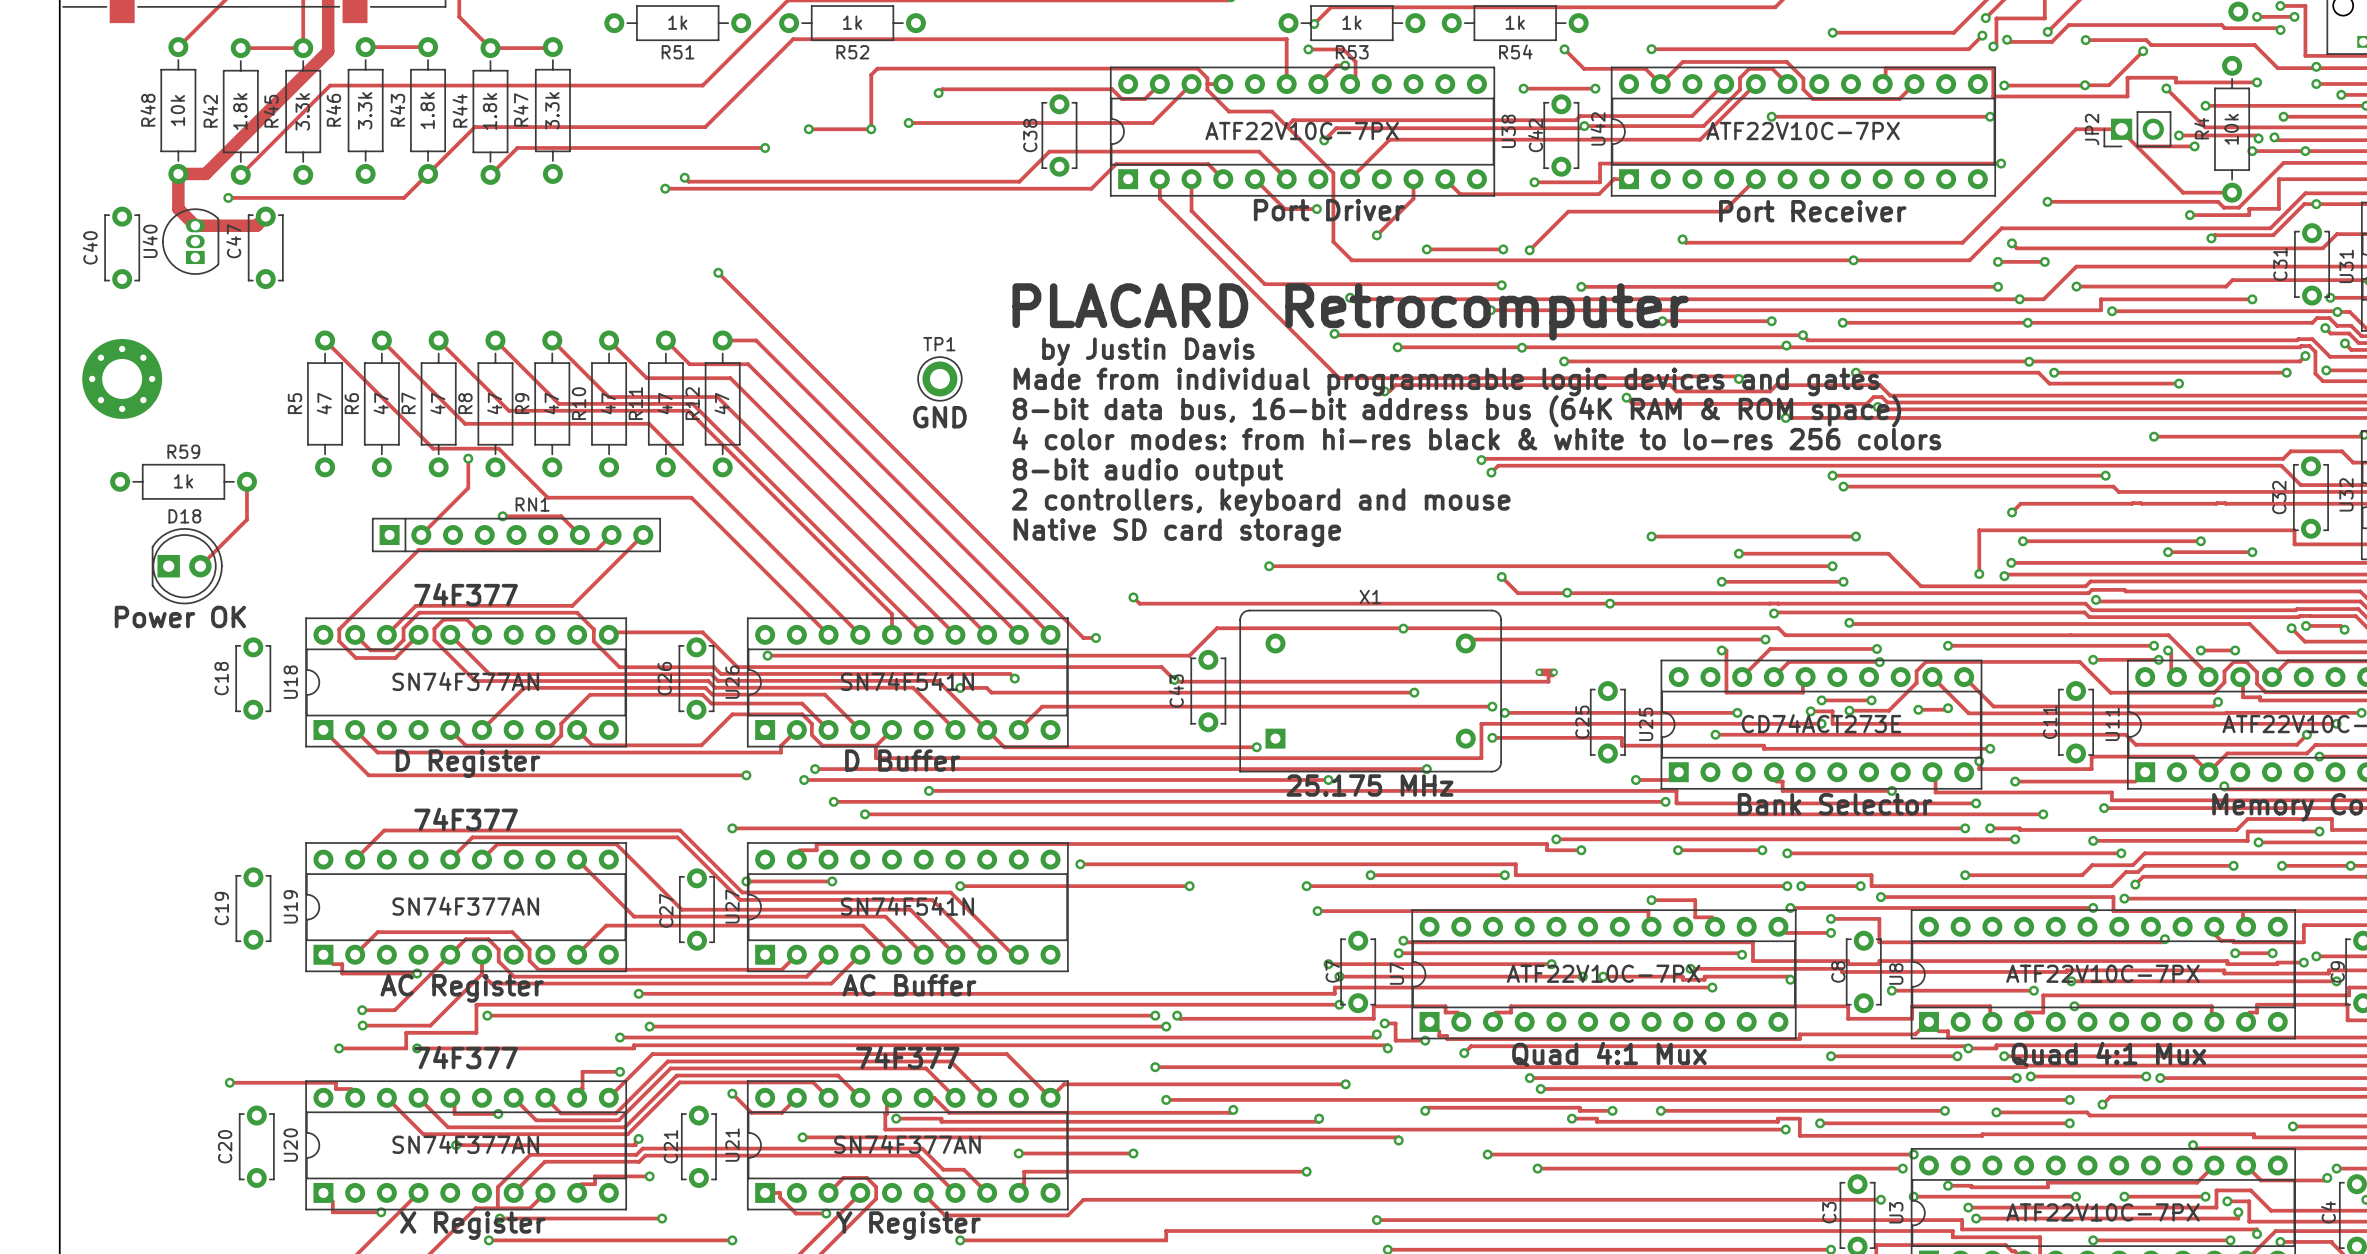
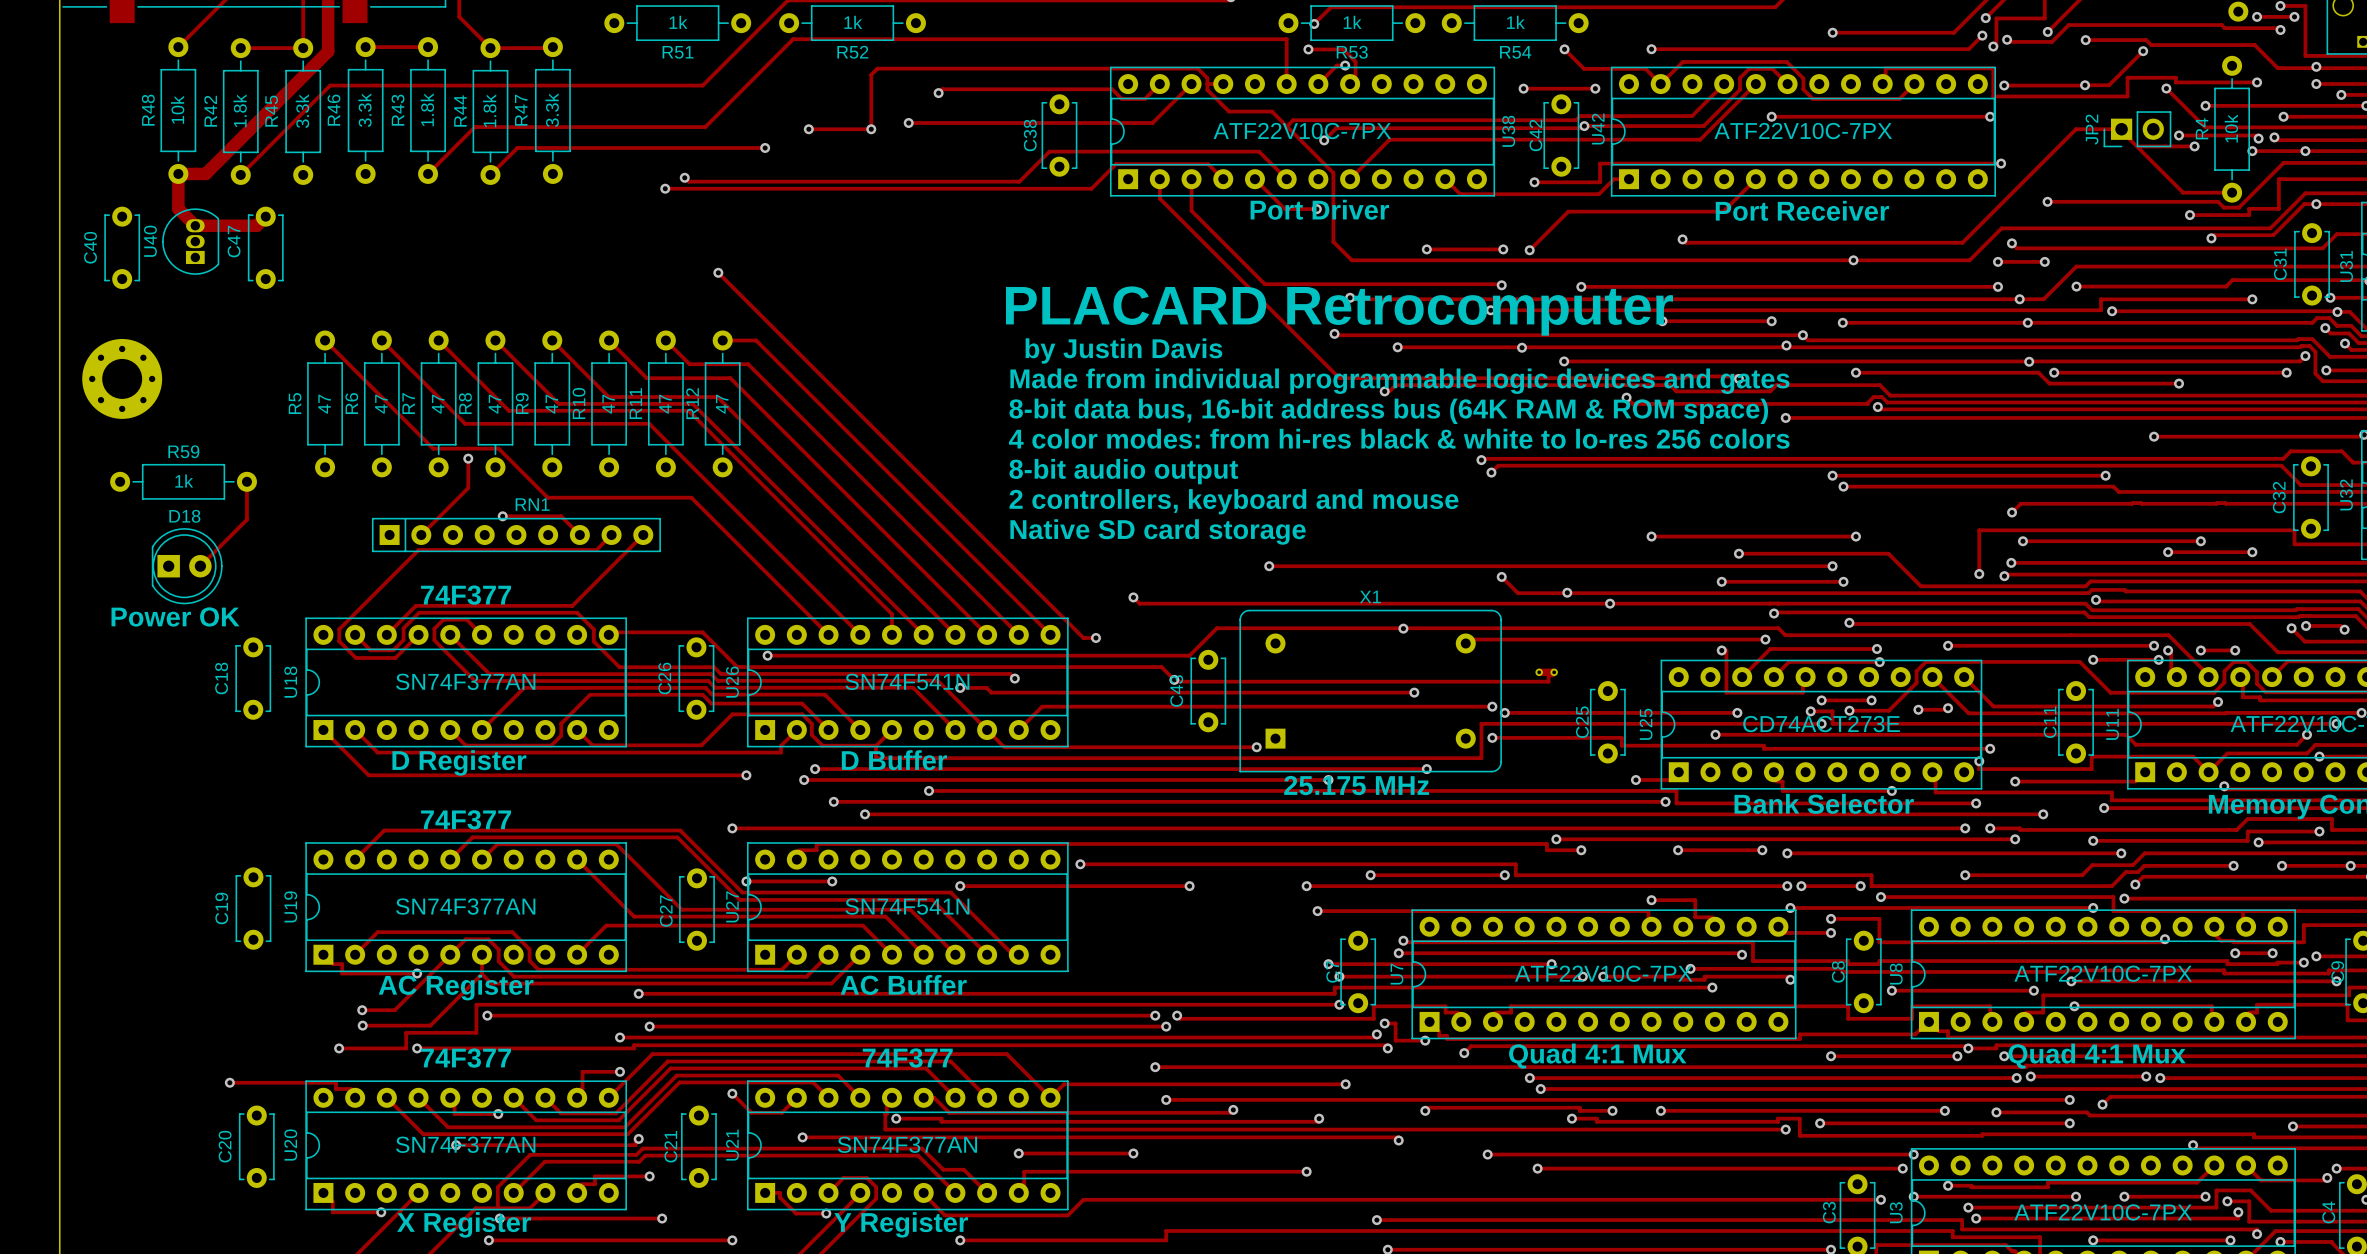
track: (428, 173) (404, 197) (228, 197) -> none
track: (1413, 179) (1413, 198) (1376, 235) -> none
via: (228, 197) -> none
via: (1376, 235) -> none
TP1: (939, 378) -> none
text: GND (939, 417) -> none

